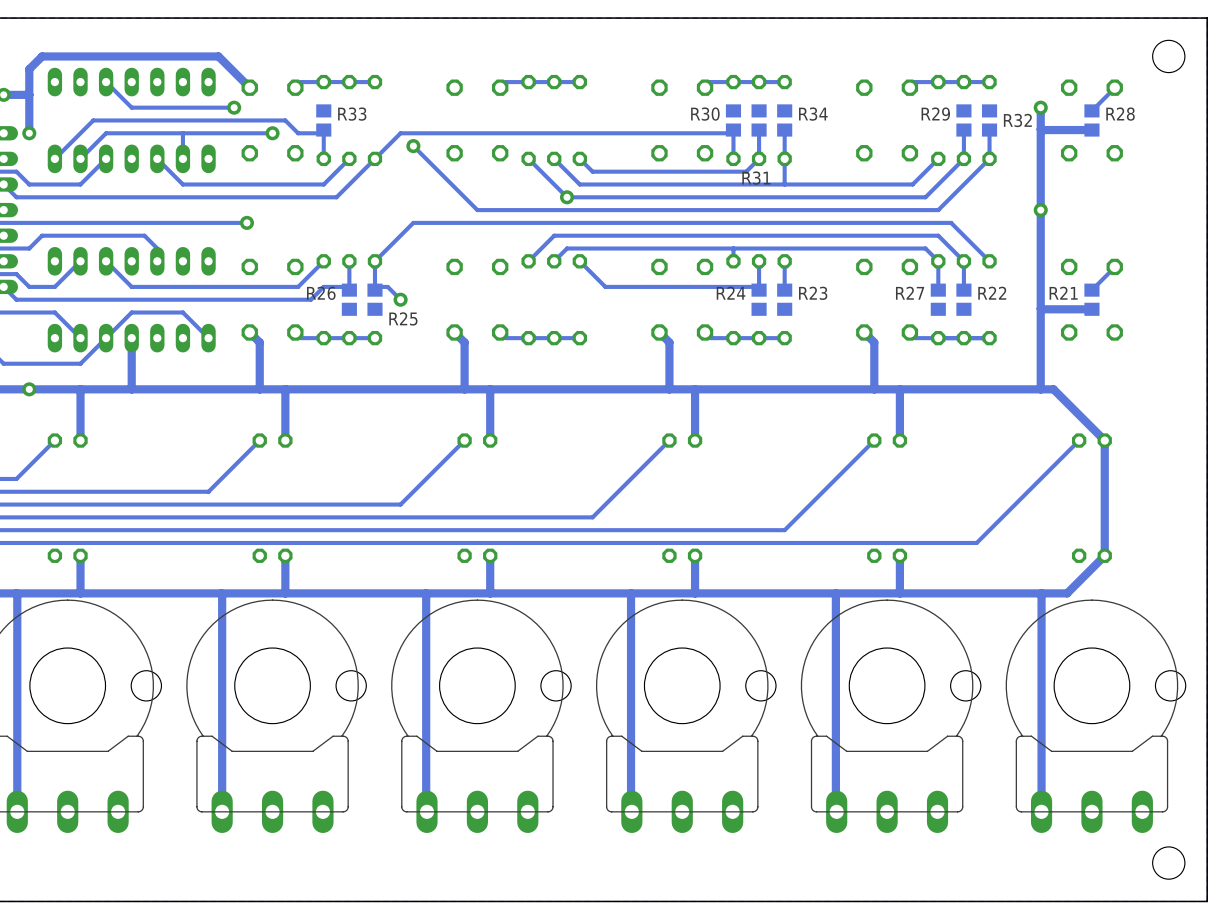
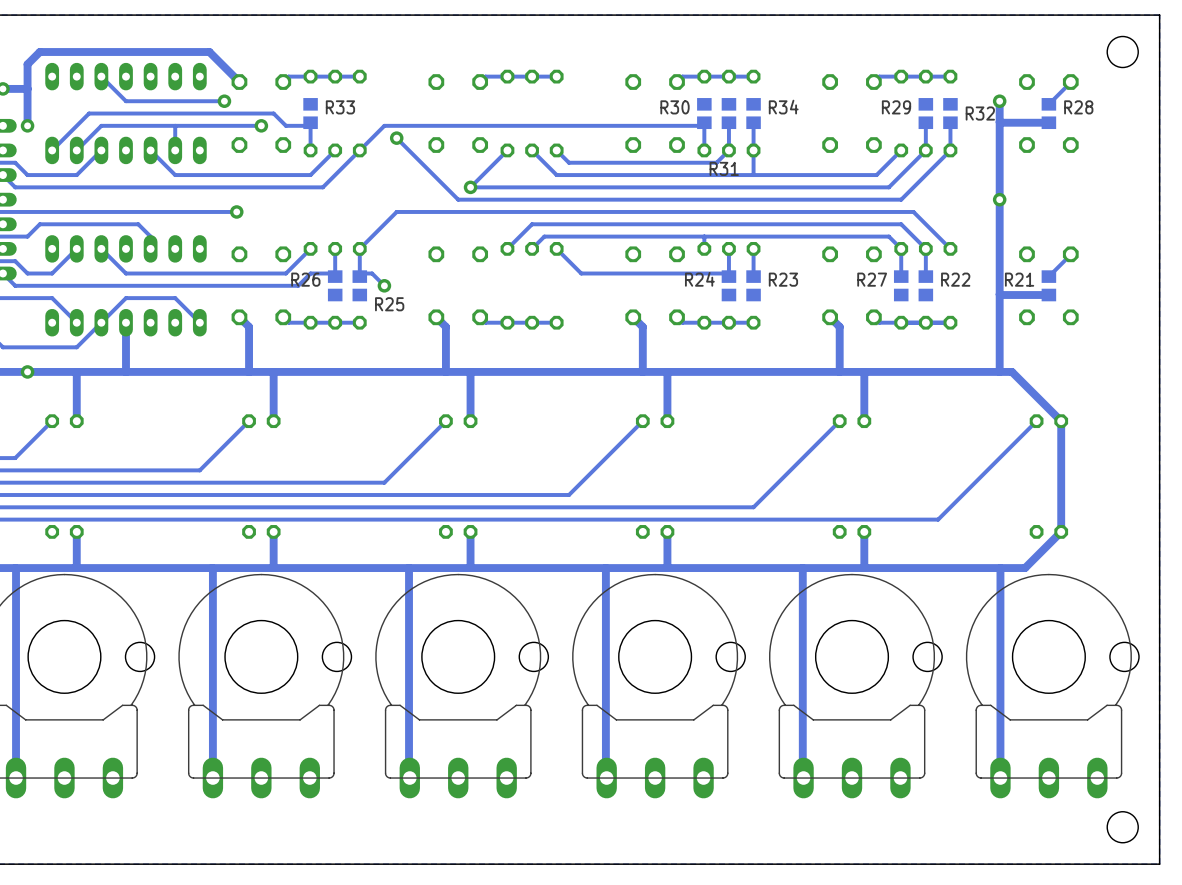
track: (528, 158) (567, 197) -> (507, 150) (470, 187) (544, 187)
via: none -> (470, 187)
via: (567, 197) -> none

